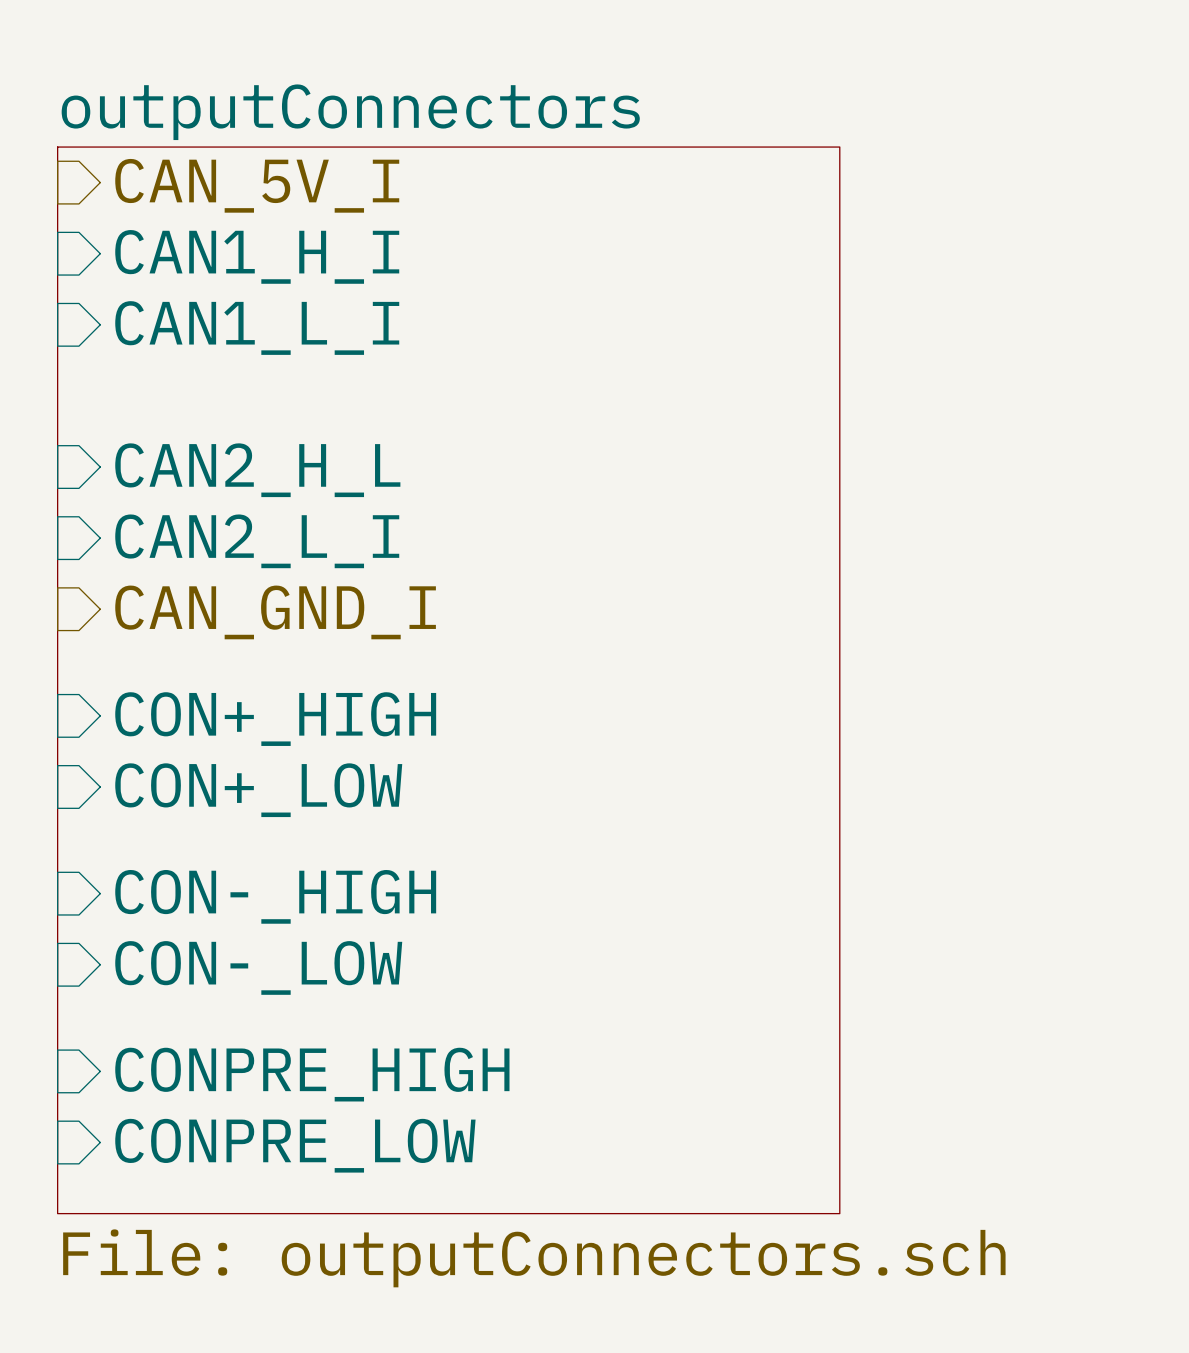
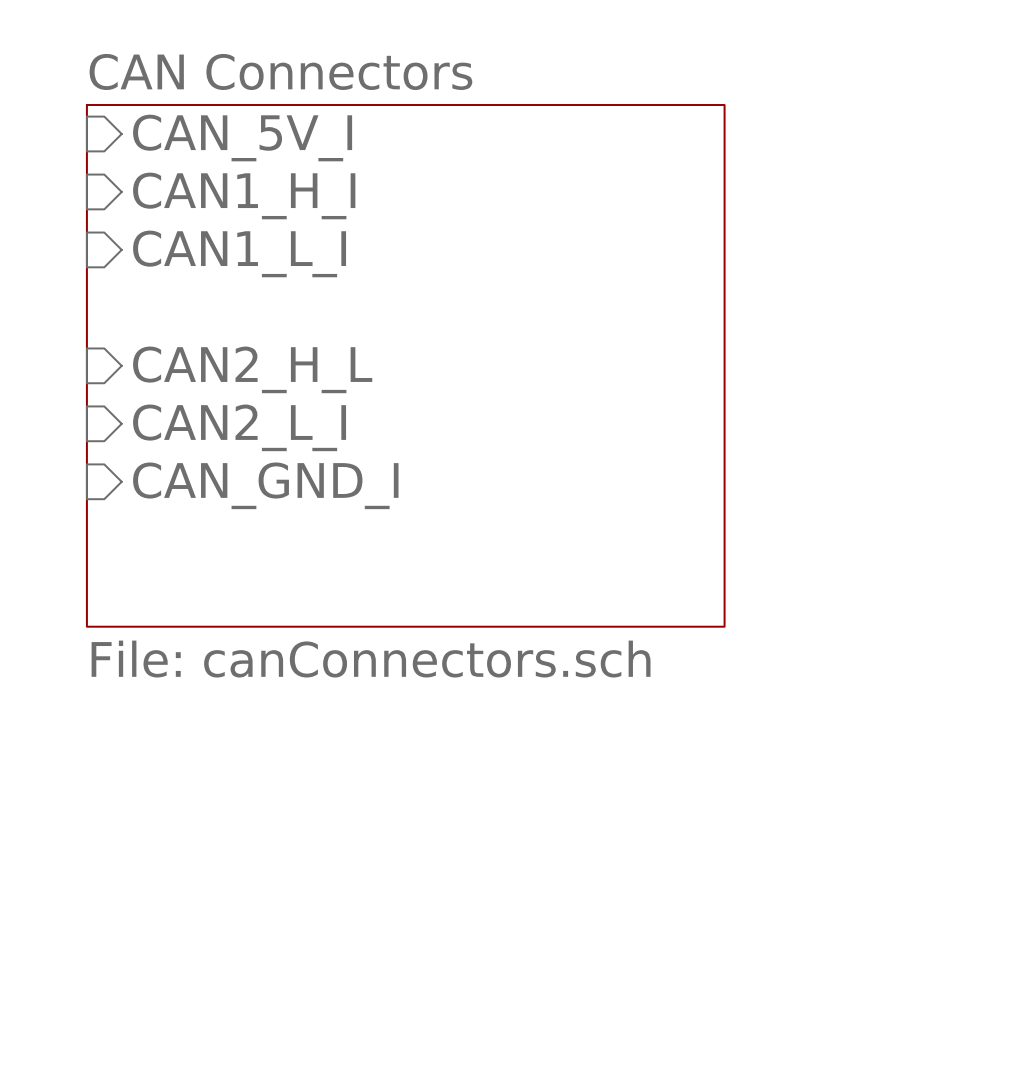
sheet CAN Connectors: none -> File: canConnectors.sch (405, 365)
sheet outputConnectors: File: outputConnectors.sch (448, 680) -> none
sheet pin: CON+_HIGH (275, 719) -> none
sheet pin: CON+_LOW (258, 790) -> none
sheet pin: CON-_HIGH (275, 896) -> none
sheet pin: CON-_LOW (258, 967) -> none
sheet pin: CONPRE_HIGH (312, 1074) -> none
sheet pin: CONPRE_LOW (295, 1145) -> none

